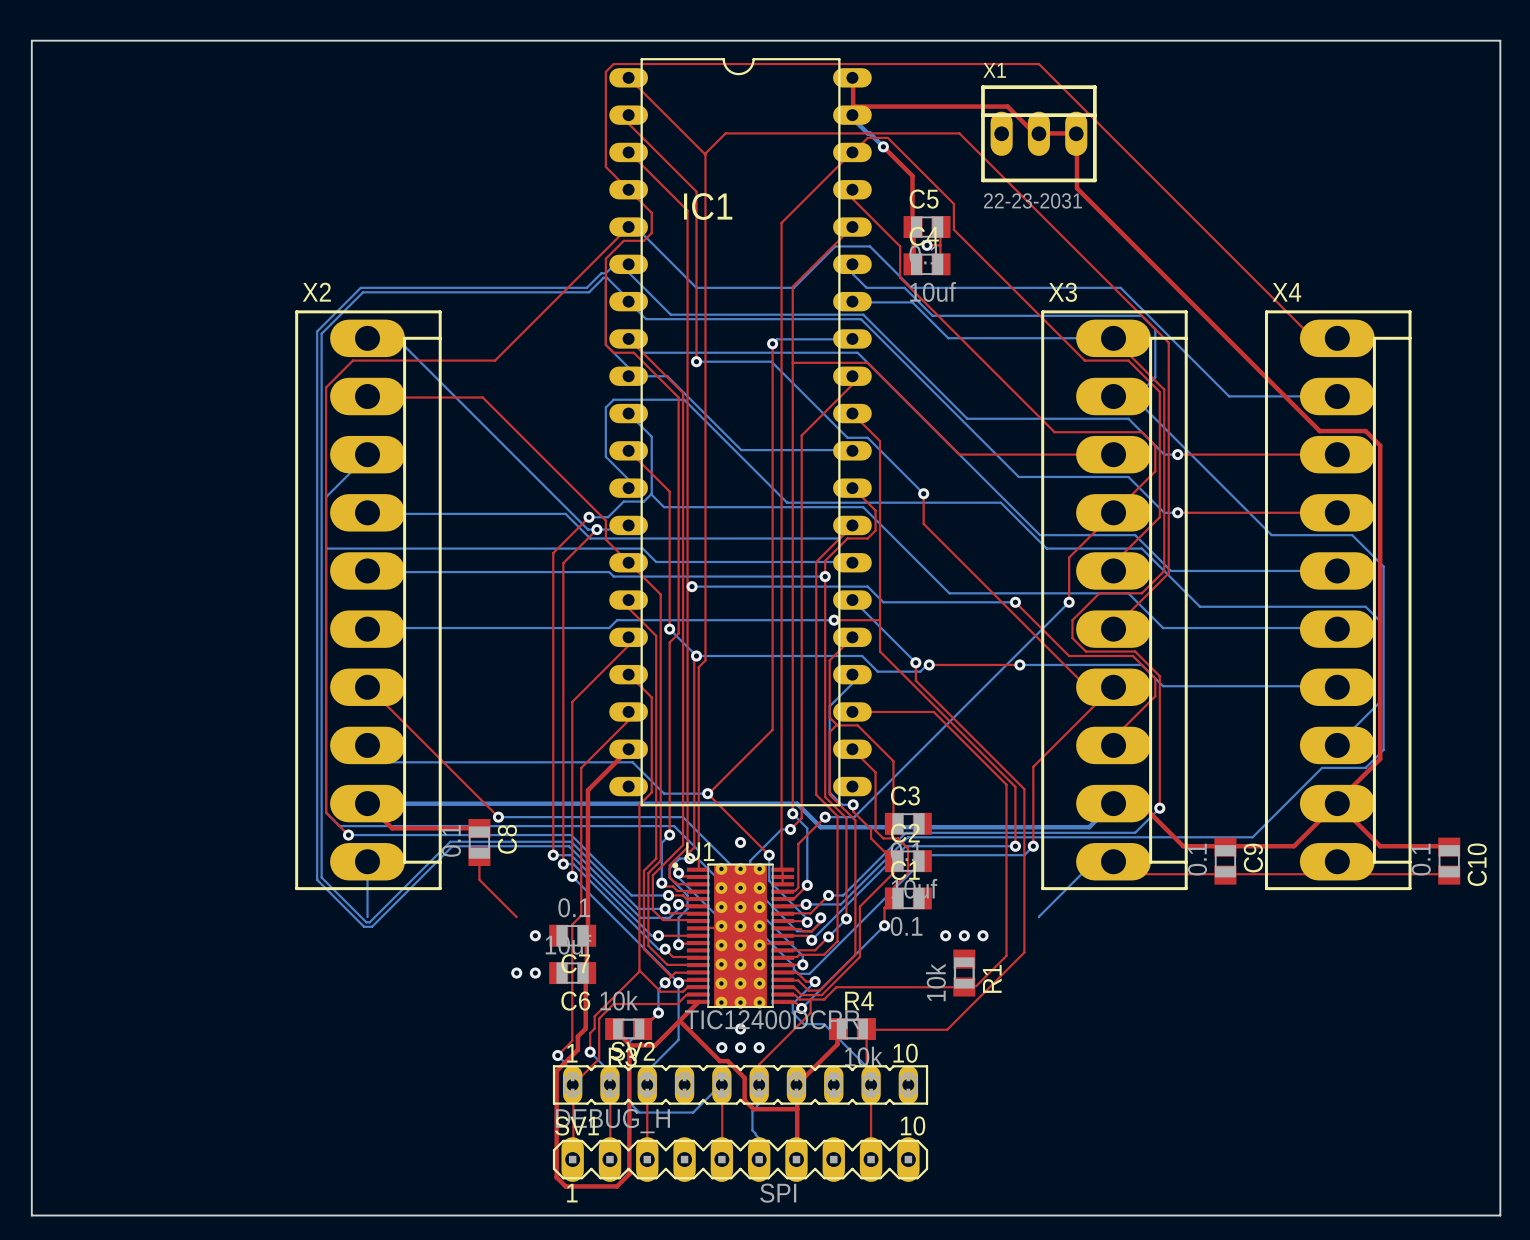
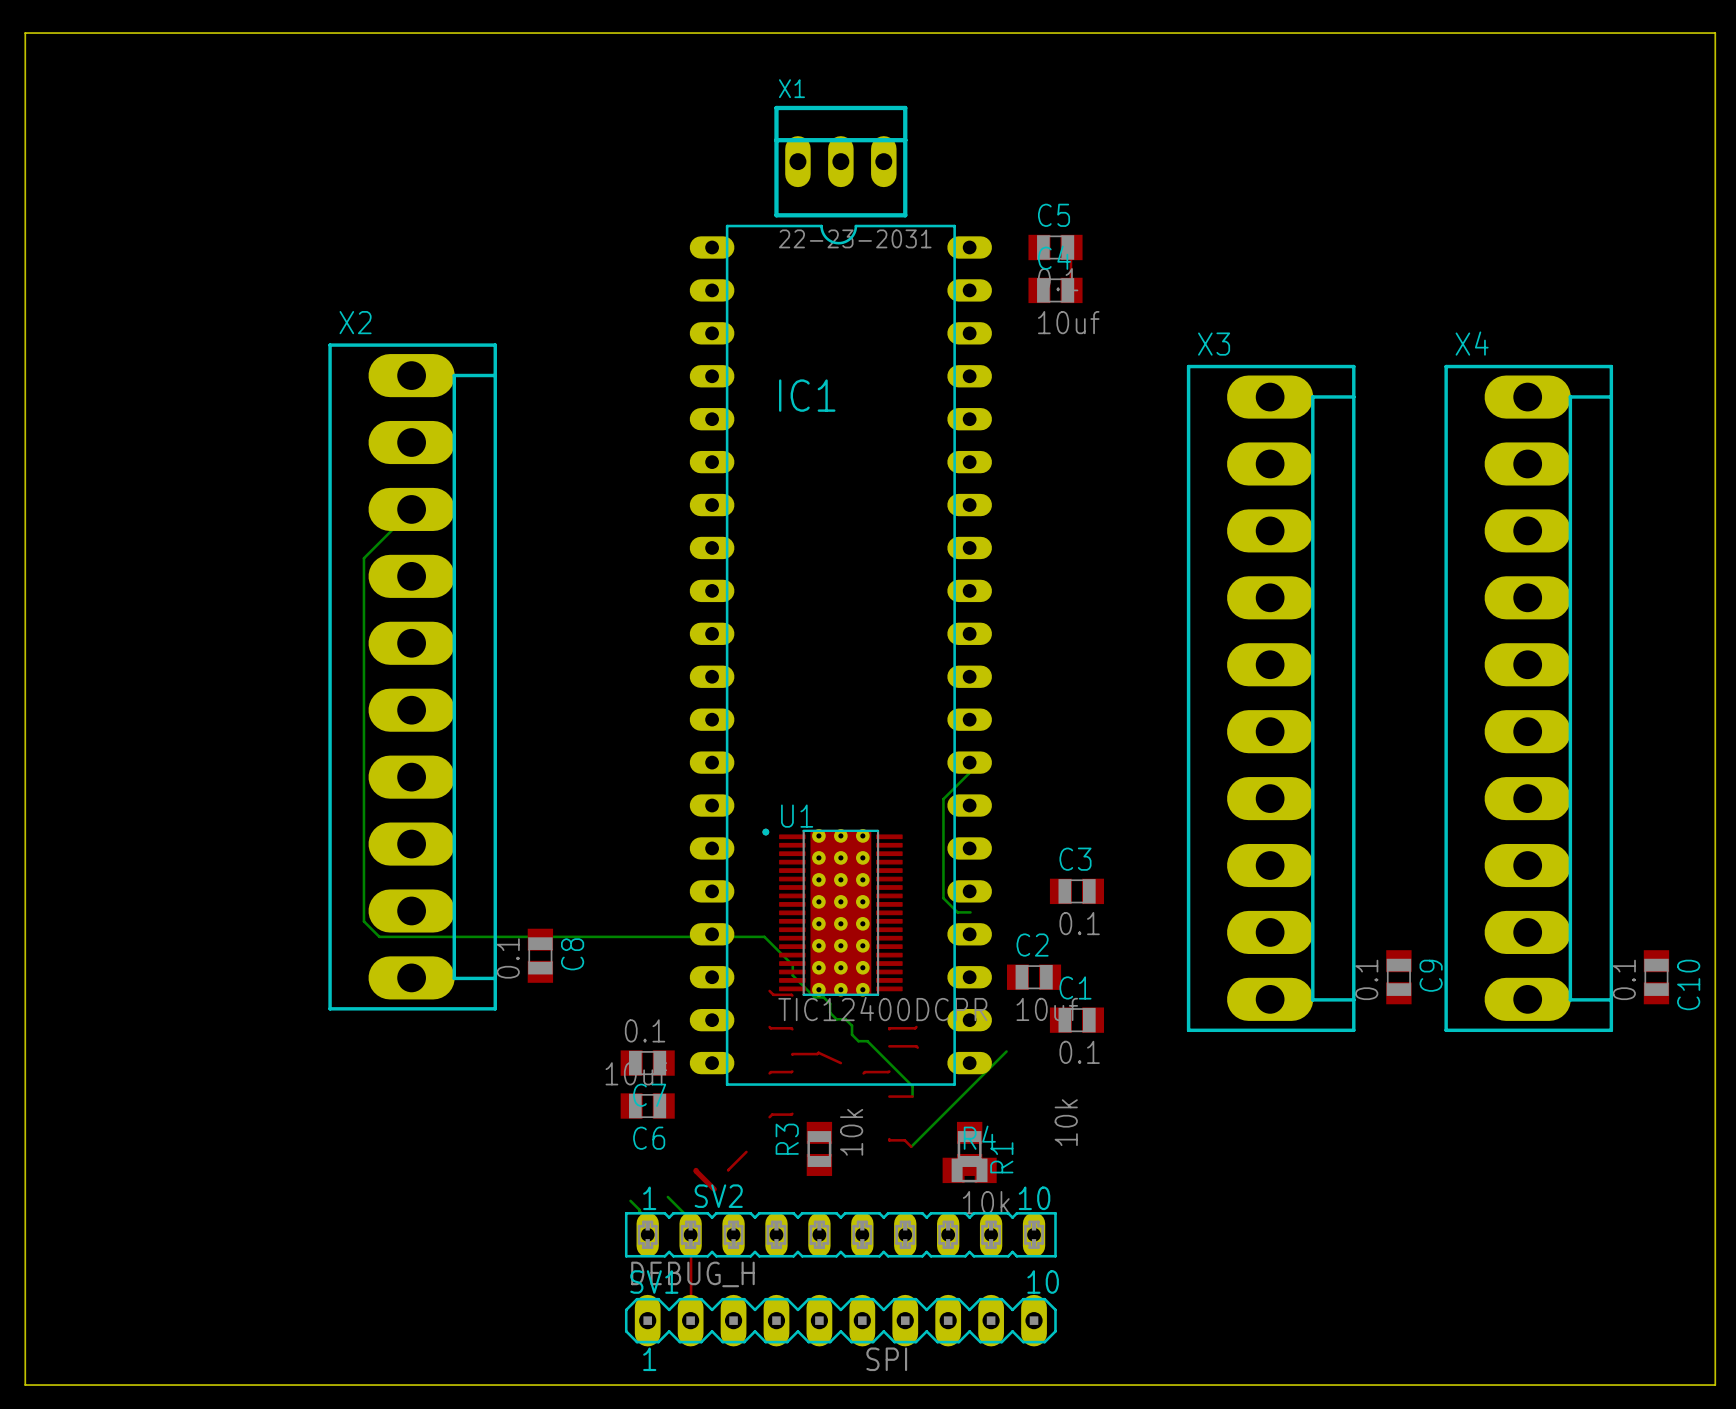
top track: (628, 77) (705, 154) (705, 660) (698, 667) (698, 869) -> none
top track: (852, 77) (852, 115) (854, 106) (1007, 106) (1033, 132) (1075, 133) (1076, 188) (1319, 431) (1365, 431) (1380, 445) (1380, 758) (1337, 803) -> none
top track: (628, 115) (629, 124) (696, 191) (696, 361) -> none
bottom track: (852, 115) (853, 118) (883, 146) -> none
X1 position: (1038, 133) -> (840, 161)
top track: (883, 146) (912, 175) (913, 264) -> none
via: (883, 146) -> none
top track: (628, 152) (687, 210) (687, 847) (669, 865) (669, 877) (677, 884) (698, 884) -> none
top track: (704, 154) (725, 133) (959, 133) (1168, 342) (1168, 573) (1113, 629) -> none
top track: (852, 189) (853, 199) (900, 246) (900, 277) (1054, 432) (1141, 432) (1155, 445) (1155, 471) (1069, 557) (1069, 602) -> none
top track: (628, 227) (495, 360) (352, 360) (326, 387) (326, 812) (348, 835) -> none
bottom track: (628, 227) (636, 227) (696, 287) (793, 287) (835, 246) (869, 246) (911, 287) (1120, 287) (1229, 396) (1337, 396) -> none
top track: (852, 227) (792, 286) (792, 813) -> none
top track: (927, 245) (940, 245) -> none
via: (927, 245) -> none
bottom track: (852, 264) (853, 274) (866, 287) (904, 287) (932, 315) (1141, 315) (1155, 329) (1155, 377) (1135, 397) (1113, 396) (1113, 397) (1134, 397) (1271, 535) (1352, 535) (1383, 566) (1383, 750) (1365, 767) (1322, 767) (1252, 837) (908, 837) (840, 904) (806, 904) -> none
bottom track: (605, 282) (605, 344) (628, 367) (628, 376) (667, 376) (741, 450) (852, 450) -> none
bottom track: (852, 301) (912, 302) (948, 338) (1113, 338) -> none
bottom track: (367, 338) (397, 339) (587, 529) (624, 529) (628, 525) -> none
top track: (628, 338) (683, 393) (683, 845) (652, 875) (652, 910) (662, 920) (698, 921) -> none
bottom track: (628, 338) (642, 352) (857, 352) (1040, 535) (1135, 535) (1170, 570) (1337, 570) -> none
bottom track: (852, 338) (777, 339) (772, 343) -> none
top track: (1113, 338) (1164, 389) (1164, 570) (1141, 593) (1099, 593) (1072, 620) (1072, 638) (1085, 651) (1135, 651) (1159, 676) (1159, 808) -> none
top track: (1337, 338) (1313, 338) (1038, 64) (613, 64) (605, 71) (605, 166) (651, 212) (651, 233) (643, 240) (623, 240) (605, 258) (605, 344) (613, 352) (633, 352) (678, 397) (678, 633) (669, 642) (669, 835) -> none
top track: (772, 343) (772, 729) (707, 793) (769, 855) -> none
via: (772, 343) -> none
bottom track: (696, 361) (771, 361) (847, 437) (867, 437) (923, 493) -> none
via: (696, 361) -> none
top track: (792, 362) (867, 362) (959, 454) (1113, 454) -> none
top track: (852, 376) (852, 385) (801, 435) (801, 818) (790, 829) -> none
top track: (367, 396) (482, 397) (605, 520) (605, 539) (660, 594) (660, 860) (648, 873) (648, 945) (667, 964) (698, 965) -> none
bottom track: (628, 413) (651, 436) (651, 493) (643, 501) (623, 501) (608, 517) (589, 517) -> none
top track: (852, 413) (880, 441) (880, 651) (1015, 786) (1015, 846) -> none
IC1 position: (740, 432) -> (840, 655)
top track: (628, 450) (669, 491) (669, 629) -> none
top track: (1177, 454) (1337, 454) -> none
bottom track: (1177, 454) (1164, 454) (1128, 418) (967, 418) (863, 314) (670, 314) (629, 273) (629, 264) (614, 264) (605, 273) (601, 273) (586, 287) (360, 287) (317, 331) (317, 879) (364, 926) (371, 926) (452, 846) (568, 846) (640, 917) (669, 917) (678, 908) (678, 904) -> none
via: (1177, 454) -> none
bottom track: (628, 488) (628, 479) (605, 456) (605, 407) (613, 399) (684, 399) (787, 502) (1000, 502) (1046, 548) (1141, 548) (1200, 606) (1365, 606) (1379, 620) (1379, 703) (1337, 745) -> none
top track: (852, 488) (875, 510) (875, 530) (867, 538) (847, 538) (825, 560) (825, 797) (846, 818) (846, 918) -> none
top track: (923, 493) (923, 523) (1099, 699) (1113, 687) (1033, 766) (1033, 846) -> none
via: (923, 493) -> none
bottom track: (651, 494) (664, 507) (863, 507) (949, 593) (1128, 593) (1163, 628) (1337, 629) -> none
bottom track: (367, 512) (565, 513) (590, 538) (839, 538) (852, 525) -> none
top track: (1177, 512) (1337, 512) -> none
bottom track: (1177, 512) (1164, 512) (1128, 476) (1018, 476) (861, 319) (646, 319) (606, 277) (603, 277) (589, 292) (363, 292) (321, 333) (321, 877) (366, 922) (369, 922) (450, 841) (571, 841) (638, 908) (665, 908) -> none
via: (1177, 512) -> none
top track: (589, 517) (553, 553) (553, 855) -> none
via: (589, 517) -> none
top track: (852, 525) (816, 562) (816, 794) (837, 816) (837, 941) (824, 954) (799, 954) (797, 957) (782, 957) -> none
top track: (596, 529) (563, 563) (563, 864) -> none
via: (596, 529) -> none
bottom track: (326, 548) (642, 548) (656, 562) (852, 562) -> none
bottom track: (367, 570) (609, 572) (613, 576) (825, 576) -> none
top track: (1113, 570) (1113, 563) (1159, 517) (1159, 391) (1128, 360) (1084, 360) (953, 229) (953, 203) (887, 137) (867, 137) (781, 222) (782, 884) -> none
via: (825, 576) -> none
bottom track: (692, 586) (867, 586) (883, 602) (1015, 602) -> none
via: (692, 586) -> none
top track: (628, 600) (629, 609) (656, 635) (656, 858) (643, 870) (643, 949) (671, 976) -> none
bottom track: (852, 600) (915, 662) -> none
X3 position: (1114, 600) -> (1271, 698)
X4 position: (1338, 600) -> (1528, 698)
top track: (1015, 602) (1069, 656) (1132, 656) (1155, 678) (1155, 696) (1113, 737) (1113, 745) -> none
via: (1015, 602) -> none
bottom track: (1069, 602) (854, 817) (825, 817) -> none
via: (1069, 602) -> none
top track: (834, 620) (880, 620) -> none
bottom track: (834, 620) (617, 620) (609, 628) (367, 629) -> none
via: (834, 620) -> none
bottom track: (669, 629) (696, 656) (862, 656) (877, 671) (920, 671) (929, 664) -> none
via: (669, 629) -> none
top track: (628, 637) (628, 645) (572, 701) (572, 876) -> none
top track: (852, 637) (829, 660) (829, 717) (837, 725) (857, 725) (893, 761) (894, 823) -> none
top track: (696, 656) (694, 658) (694, 847) (689, 851) (689, 858) -> none
via: (696, 656) -> none
top track: (915, 662) (915, 680) (1024, 789) (1024, 952) (947, 1029) (866, 1029) (866, 1080) (871, 1084) (871, 1159) -> none
via: (915, 662) -> none
top track: (929, 664) (1019, 664) -> none
via: (929, 664) -> none
bottom track: (1019, 664) (1141, 664) (1163, 686) (1337, 687) -> none
via: (1019, 664) -> none
top track: (628, 674) (651, 697) (651, 792) (639, 804) (639, 970) (660, 991) (683, 991) (687, 987) (698, 987) -> none
top track: (367, 687) (498, 817) -> none
top track: (628, 711) (628, 720) (581, 767) (581, 915) (572, 924) (572, 1040) (557, 1055) -> none
top track: (852, 711) (933, 711) (1006, 784) (1006, 955) (976, 986) (836, 987) (824, 999) (799, 999) (794, 995) (782, 994) -> none
top track: (836, 724) (829, 732) (829, 794) (855, 820) (855, 954) (819, 990) (808, 990) (798, 980) (782, 979) -> none
bottom track: (367, 745) (384, 762) (632, 762) (664, 793) (707, 793) -> none
top track: (628, 749) (587, 790) (586, 935) -> none
top track: (852, 749) (875, 772) (875, 830) (883, 838) (897, 838) (908, 848) (908, 873) (894, 886) (894, 898) (884, 907) (884, 925) -> none
via: (707, 793) -> none
top track: (367, 803) (392, 828) (479, 828) -> none
top track: (1113, 803) (1140, 803) (1183, 846) (1225, 847) (1294, 846) (1337, 803) -> none
bottom track: (1113, 803) (1089, 827) (820, 827) (797, 803) (367, 803) -> none
top track: (1337, 803) (1380, 846) (1449, 847) -> none
top track: (853, 804) (853, 811) (871, 829) (871, 838) (894, 861) (893, 873) (859, 906) (859, 957) (821, 995) (801, 995) (793, 987) (782, 987) -> none
via: (853, 804) -> none
bottom track: (1159, 808) (1135, 832) (905, 832) (843, 895) (828, 895) -> none
via: (1159, 808) -> none
bottom track: (792, 813) (807, 828) (807, 885) -> none
via: (792, 813) -> none
bottom track: (498, 817) (683, 817) (731, 865) (731, 873) (736, 878) (744, 878) (750, 884) (750, 892) (755, 897) (763, 897) (797, 931) (811, 931) (820, 922) (820, 917) -> none
via: (498, 817) -> none
top track: (825, 817) (798, 843) (798, 887) (794, 890) (782, 891) -> none
via: (825, 817) -> none
C3 position: (908, 823) -> (1076, 891)
bottom track: (790, 829) (781, 829) (750, 860) (750, 874) (745, 879) -> none
via: (790, 829) -> none
bottom track: (348, 835) (571, 835) (631, 895) (668, 895) -> none
via: (348, 835) -> none
bottom track: (669, 835) (661, 842) (661, 883) -> none
via: (669, 835) -> none
via: (740, 842) -> none
bottom track: (1015, 846) (905, 846) (811, 940) -> none
via: (1015, 846) -> none
bottom track: (1033, 846) (1024, 855) (928, 855) (809, 973) (798, 973) (793, 969) (793, 965) (763, 935) (755, 935) (750, 930) (750, 922) (744, 916) (717, 916) (678, 877) (678, 873) -> none
via: (1033, 846) -> none
bottom track: (553, 855) (571, 855) (651, 935) (658, 935) -> none
via: (553, 855) -> none
bottom track: (769, 855) (769, 880) (807, 918) (807, 922) -> none
via: (769, 855) -> none
top track: (479, 856) (479, 879) (516, 917) -> none
bottom track: (689, 858) (679, 858) (669, 868) (669, 877) (687, 895) (687, 908) (678, 917) (678, 944) -> none
via: (689, 858) -> none
bottom track: (367, 861) (367, 917) -> none
top track: (1113, 861) (1126, 874) (1324, 874) (1337, 861) (1350, 874) (1449, 875) -> none
bottom track: (1113, 861) (1093, 861) (1038, 917) -> none
bottom track: (563, 864) (573, 864) (658, 949) (665, 949) -> none
via: (563, 864) -> none
via: (678, 873) -> none
bottom track: (572, 876) (678, 982) (678, 1039) (647, 1071) (647, 1084) -> none
via: (572, 876) -> none
top track: (661, 883) (665, 886) (673, 886) (677, 890) (698, 891) -> none
via: (661, 883) -> none
top track: (807, 885) (793, 898) (782, 898) -> none
via: (807, 885) -> none
top track: (668, 895) (683, 895) (686, 898) (698, 899) -> none
via: (668, 895) -> none
top track: (828, 895) (810, 913) (782, 913) -> none
via: (828, 895) -> none
C1 position: (908, 898) -> (1076, 1020)
via: (678, 904) -> none
via: (806, 904) -> none
top track: (665, 908) (669, 913) (698, 913) -> none
via: (665, 908) -> none
top track: (820, 917) (820, 922) (811, 931) (782, 928) -> none
via: (820, 917) -> none
bottom track: (846, 918) (828, 936) -> none
via: (846, 918) -> none
via: (807, 922) -> none
via: (884, 925) -> none
via: (535, 935) -> none
top track: (586, 935) (585, 1028) (577, 1036) (577, 1049) (556, 1071) (556, 1177) (565, 1186) (617, 1186) (629, 1174) (629, 1046) (655, 1045) (698, 1001) -> none
top track: (658, 935) (698, 935) -> none
via: (658, 935) -> none
U1 position: (733, 935) -> (832, 912)
top track: (782, 935) (807, 935) (811, 940) -> none
via: (945, 935) -> none
via: (964, 935) -> none
via: (982, 935) -> none
top track: (828, 936) (815, 950) (782, 950) -> none
via: (828, 936) -> none
via: (811, 940) -> none
via: (678, 944) -> none
top track: (665, 949) (673, 957) (698, 957) -> none
via: (665, 949) -> none
via: (802, 964) -> none
top track: (640, 971) (594, 1016) (594, 1028) (590, 1033) (590, 1052) -> none
top track: (698, 972) (675, 972) (665, 982) -> none
top track: (782, 972) (797, 972) (806, 981) (815, 981) -> none
via: (516, 973) -> none
via: (535, 973) -> none
R1 position: (964, 973) -> (969, 1148)
bottom track: (815, 981) (792, 1004) (792, 1012) (803, 1024) (824, 1024) (871, 1071) (871, 1084) -> none
via: (815, 981) -> none
bottom track: (665, 982) (658, 989) (658, 1012) (629, 1042) (629, 1102) (639, 1112) (693, 1112) (721, 1084) -> none
via: (665, 982) -> none
via: (678, 982) -> none
top track: (698, 994) (686, 995) (677, 1004) (613, 1004) (599, 1018) (599, 1058) (572, 1084) (572, 1159) -> none
top track: (810, 999) (810, 1012) (759, 1064) (759, 1084) -> none
via: (801, 1008) -> none
via: (658, 1012) -> none
top track: (679, 1020) (720, 1061) (727, 1061) (744, 1077) (744, 1100) (753, 1109) (797, 1109) -> none
R3 rotation: 0° (628, 1029) -> 90° clockwise (819, 1148)
R3 position: (628, 1029) -> (819, 1148)
via: (740, 1029) -> none
top track: (838, 1029) (837, 1044) (796, 1084) (796, 1159) -> none
via: (721, 1047) -> none
via: (740, 1047) -> none
via: (759, 1047) -> none
via: (590, 1052) -> none
via: (557, 1055) -> none
top track: (647, 1084) (647, 1159) -> none
top track: (721, 1084) (721, 1159) -> none
bottom track: (759, 1084) (759, 1103) (752, 1111) (752, 1130) (759, 1138) (759, 1159) -> none

